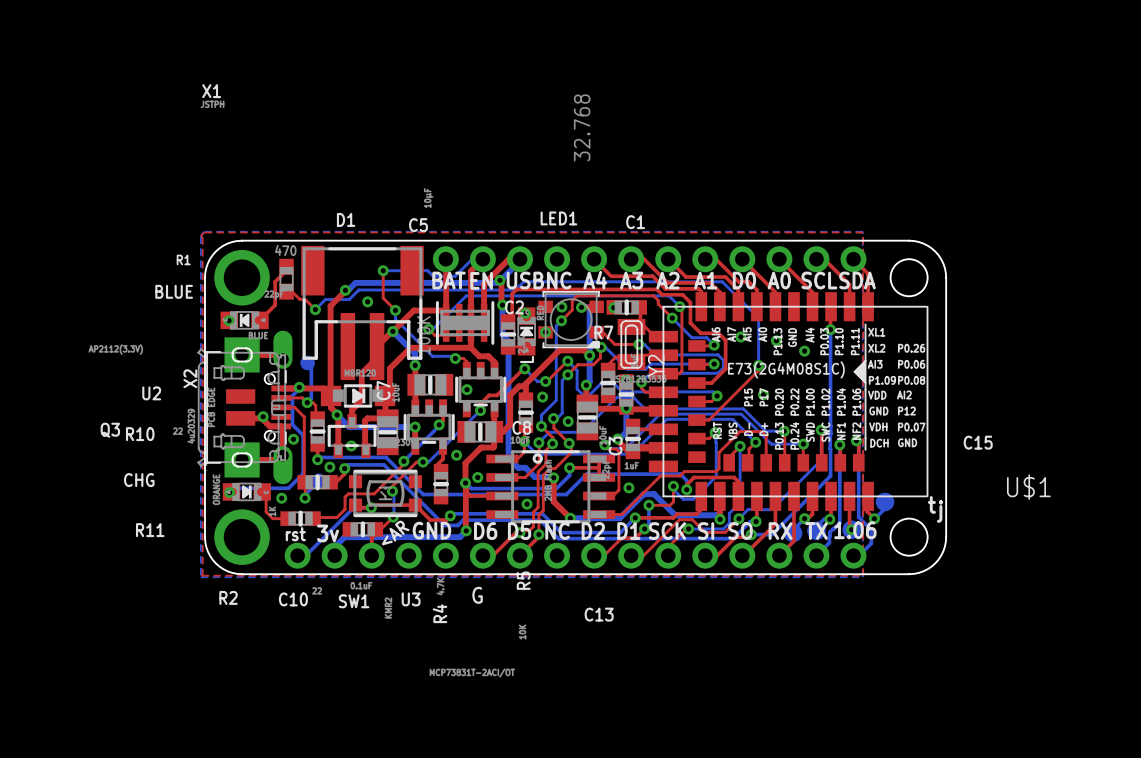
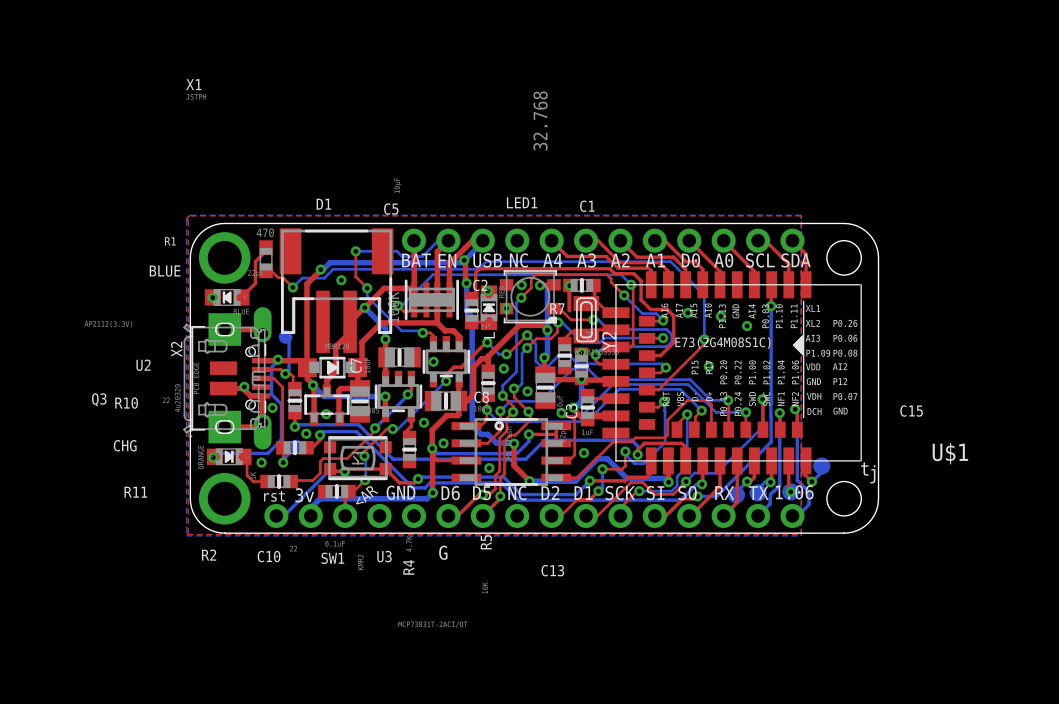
top track: none -> (574, 285) (569, 290) (569, 310)

